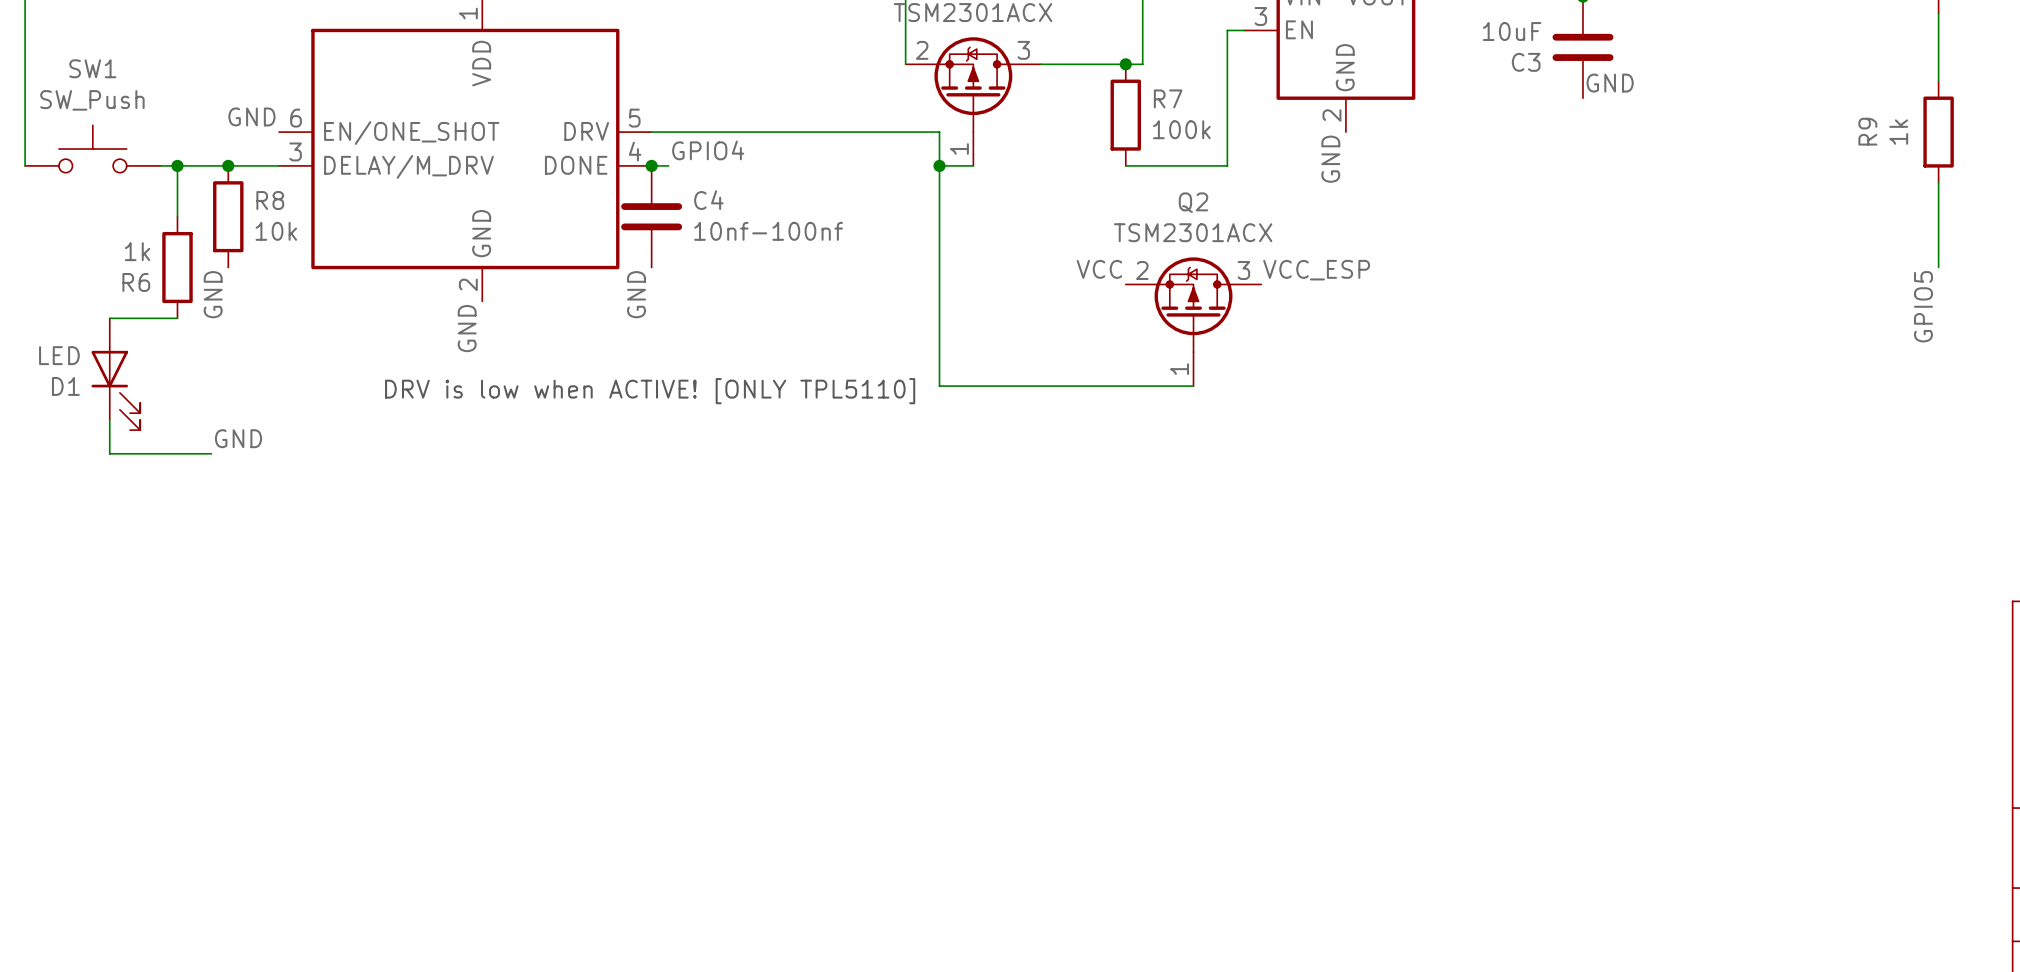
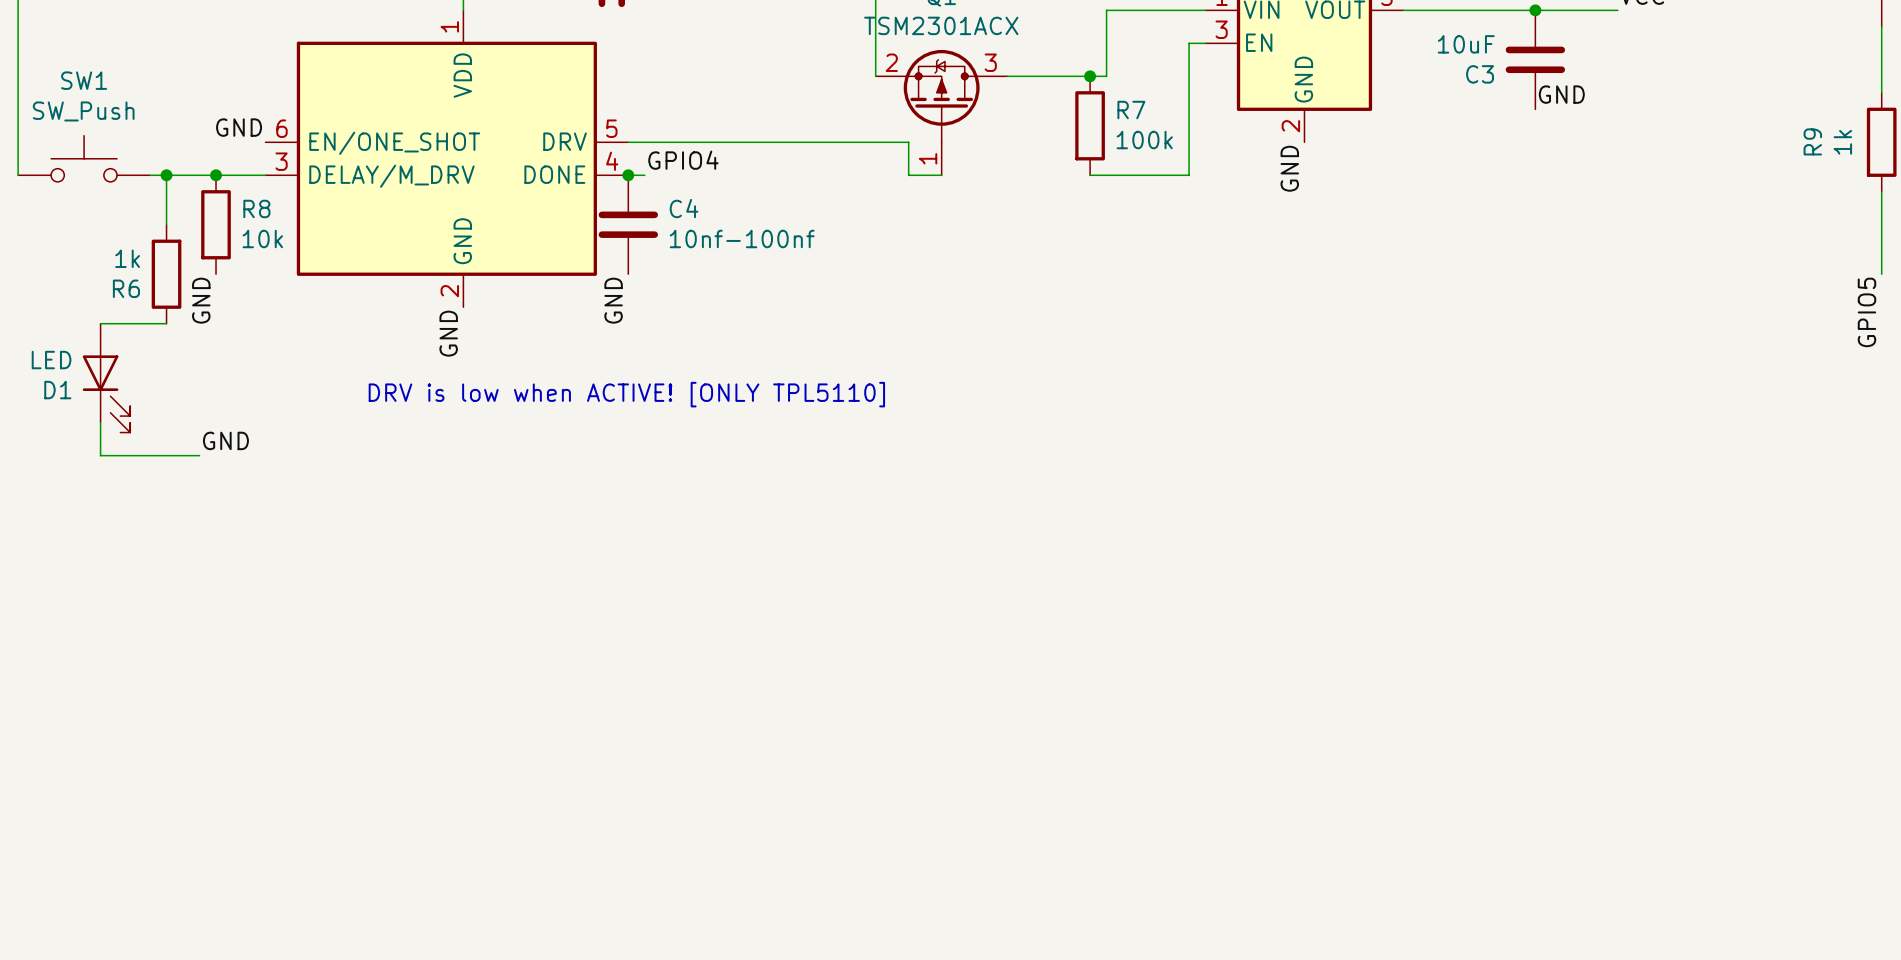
wire: (939, 165) (939, 386) (1193, 386) -> none
junction: (939, 165) -> none
label: VCC (1099, 269) -> none
label: VCC_ESP (1316, 270) -> none
Q2: TSM2301ACX (1193, 321) -> none

